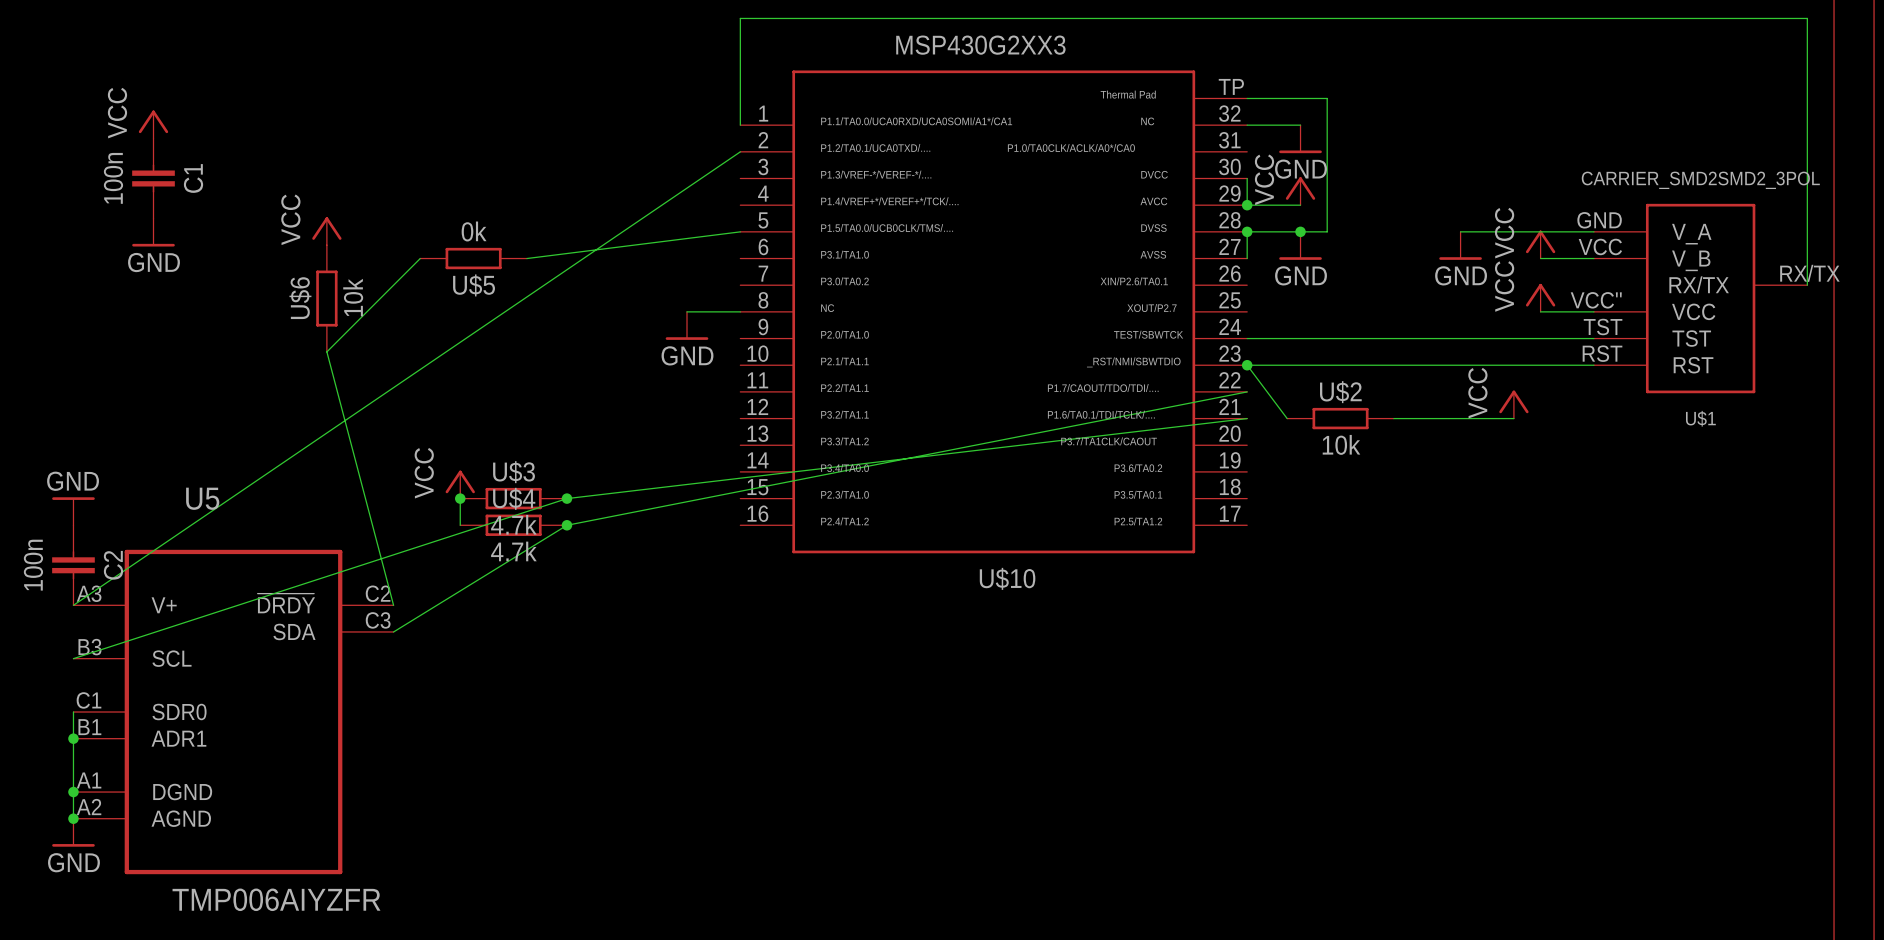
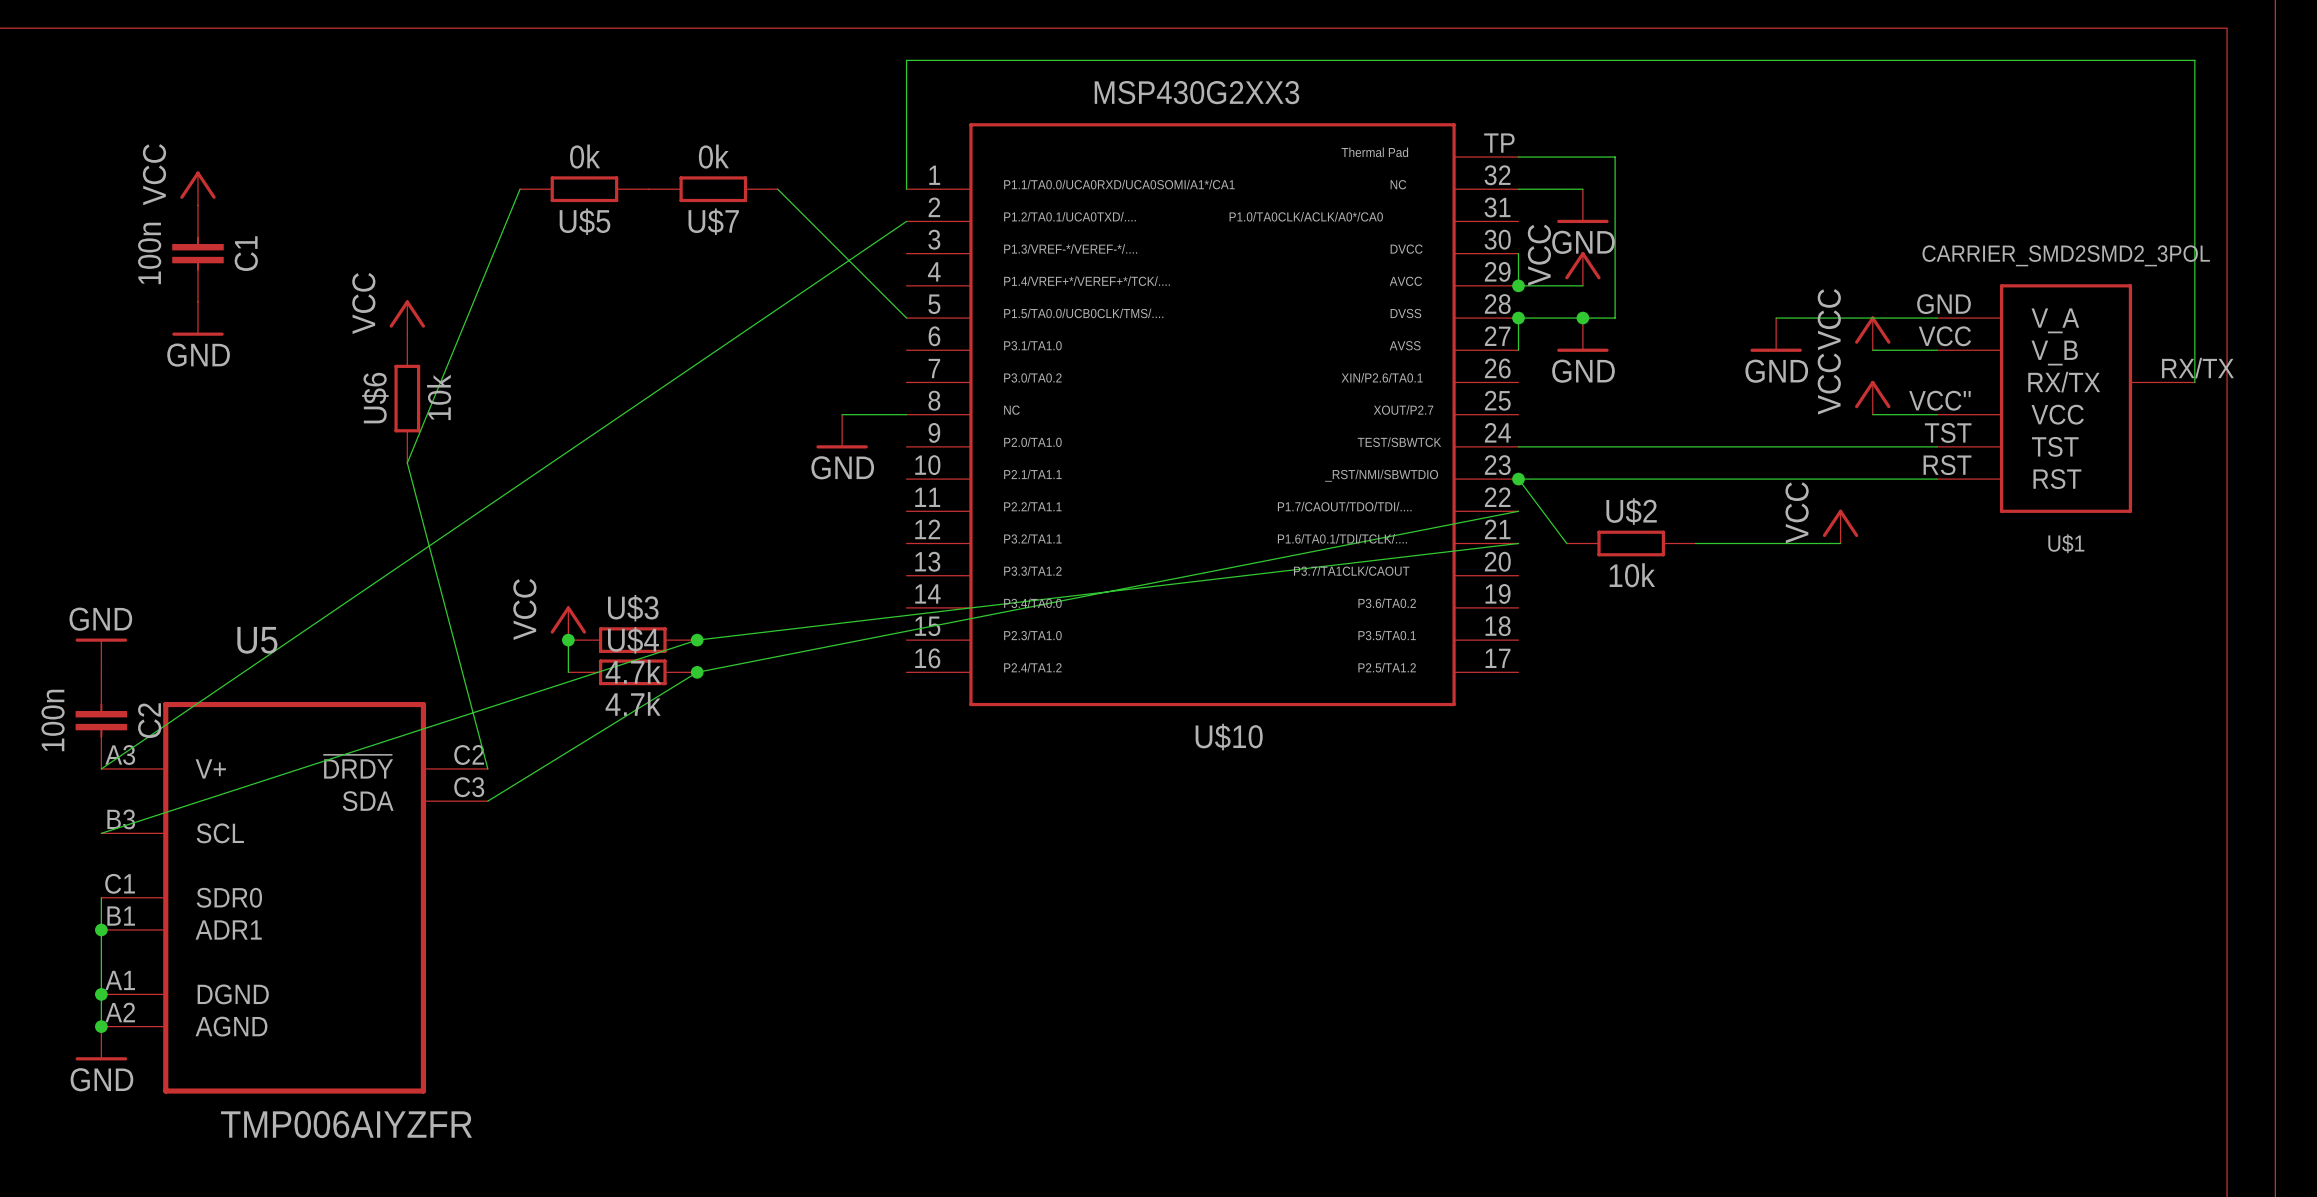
U$7: none -> 0k (713, 189)
wire: (740, 231) (526, 258) -> (906, 318) (777, 189)
wire: (420, 258) (326, 351) -> (520, 189) (407, 462)
U$5 position: (473, 258) -> (584, 189)

